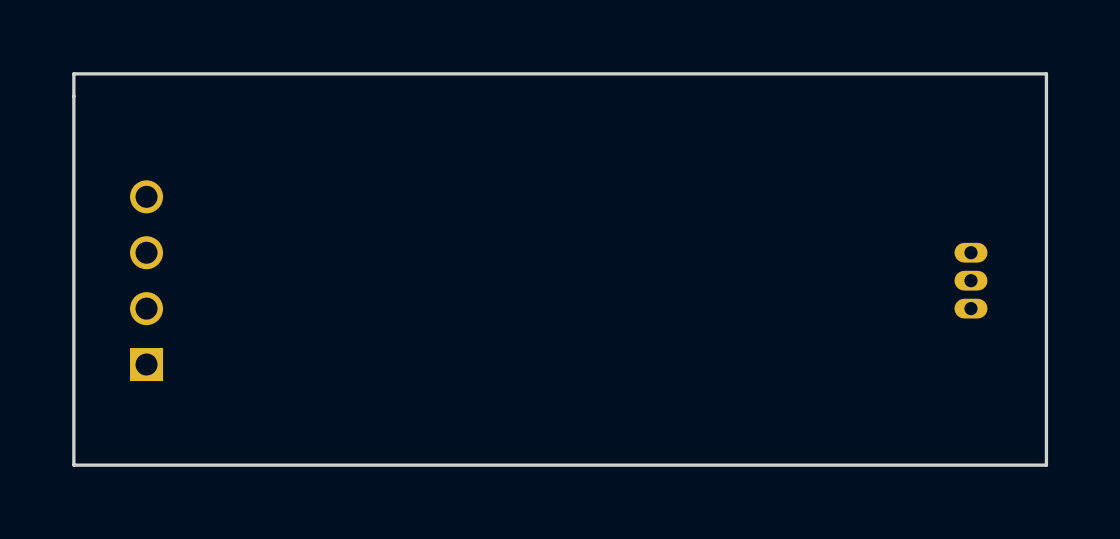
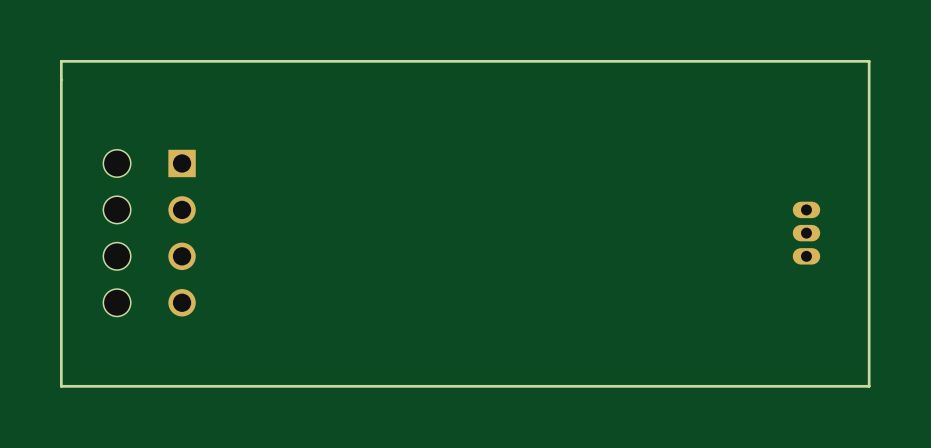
part: none -> (117, 163)
part: none -> (117, 209)
part rotation: 0° (146, 280) -> 180° (182, 233)
part: none -> (117, 256)
part: none -> (117, 302)

